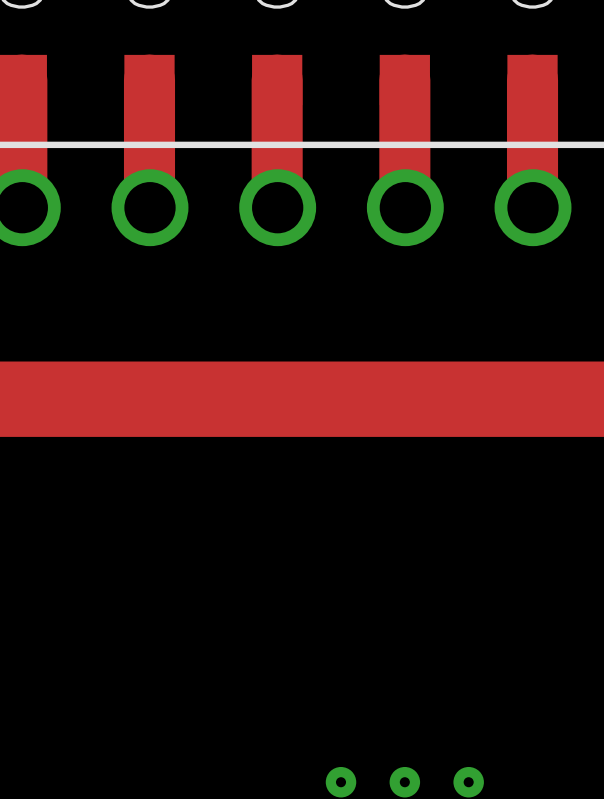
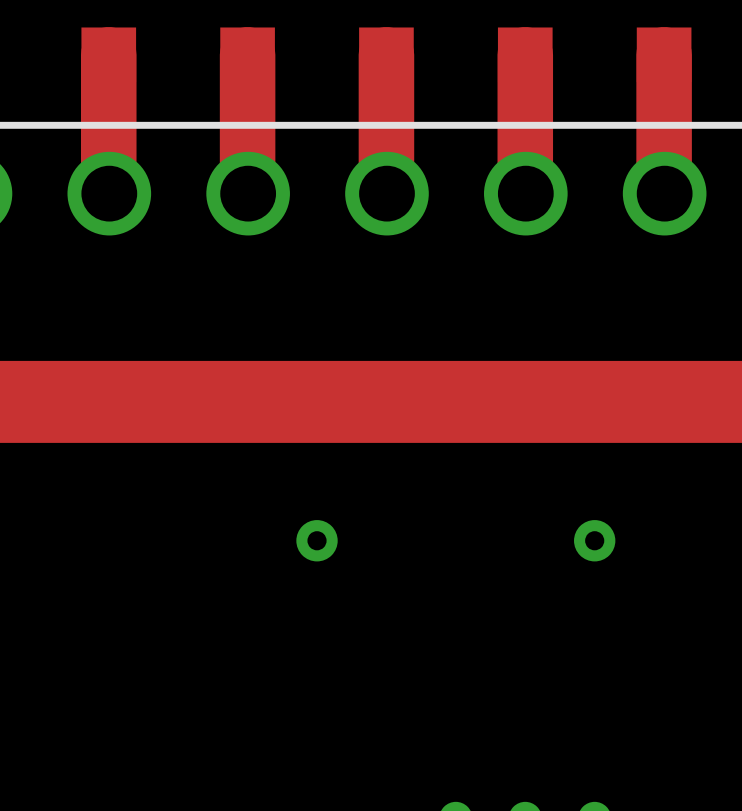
via: none -> (317, 540)
via: none -> (594, 540)

